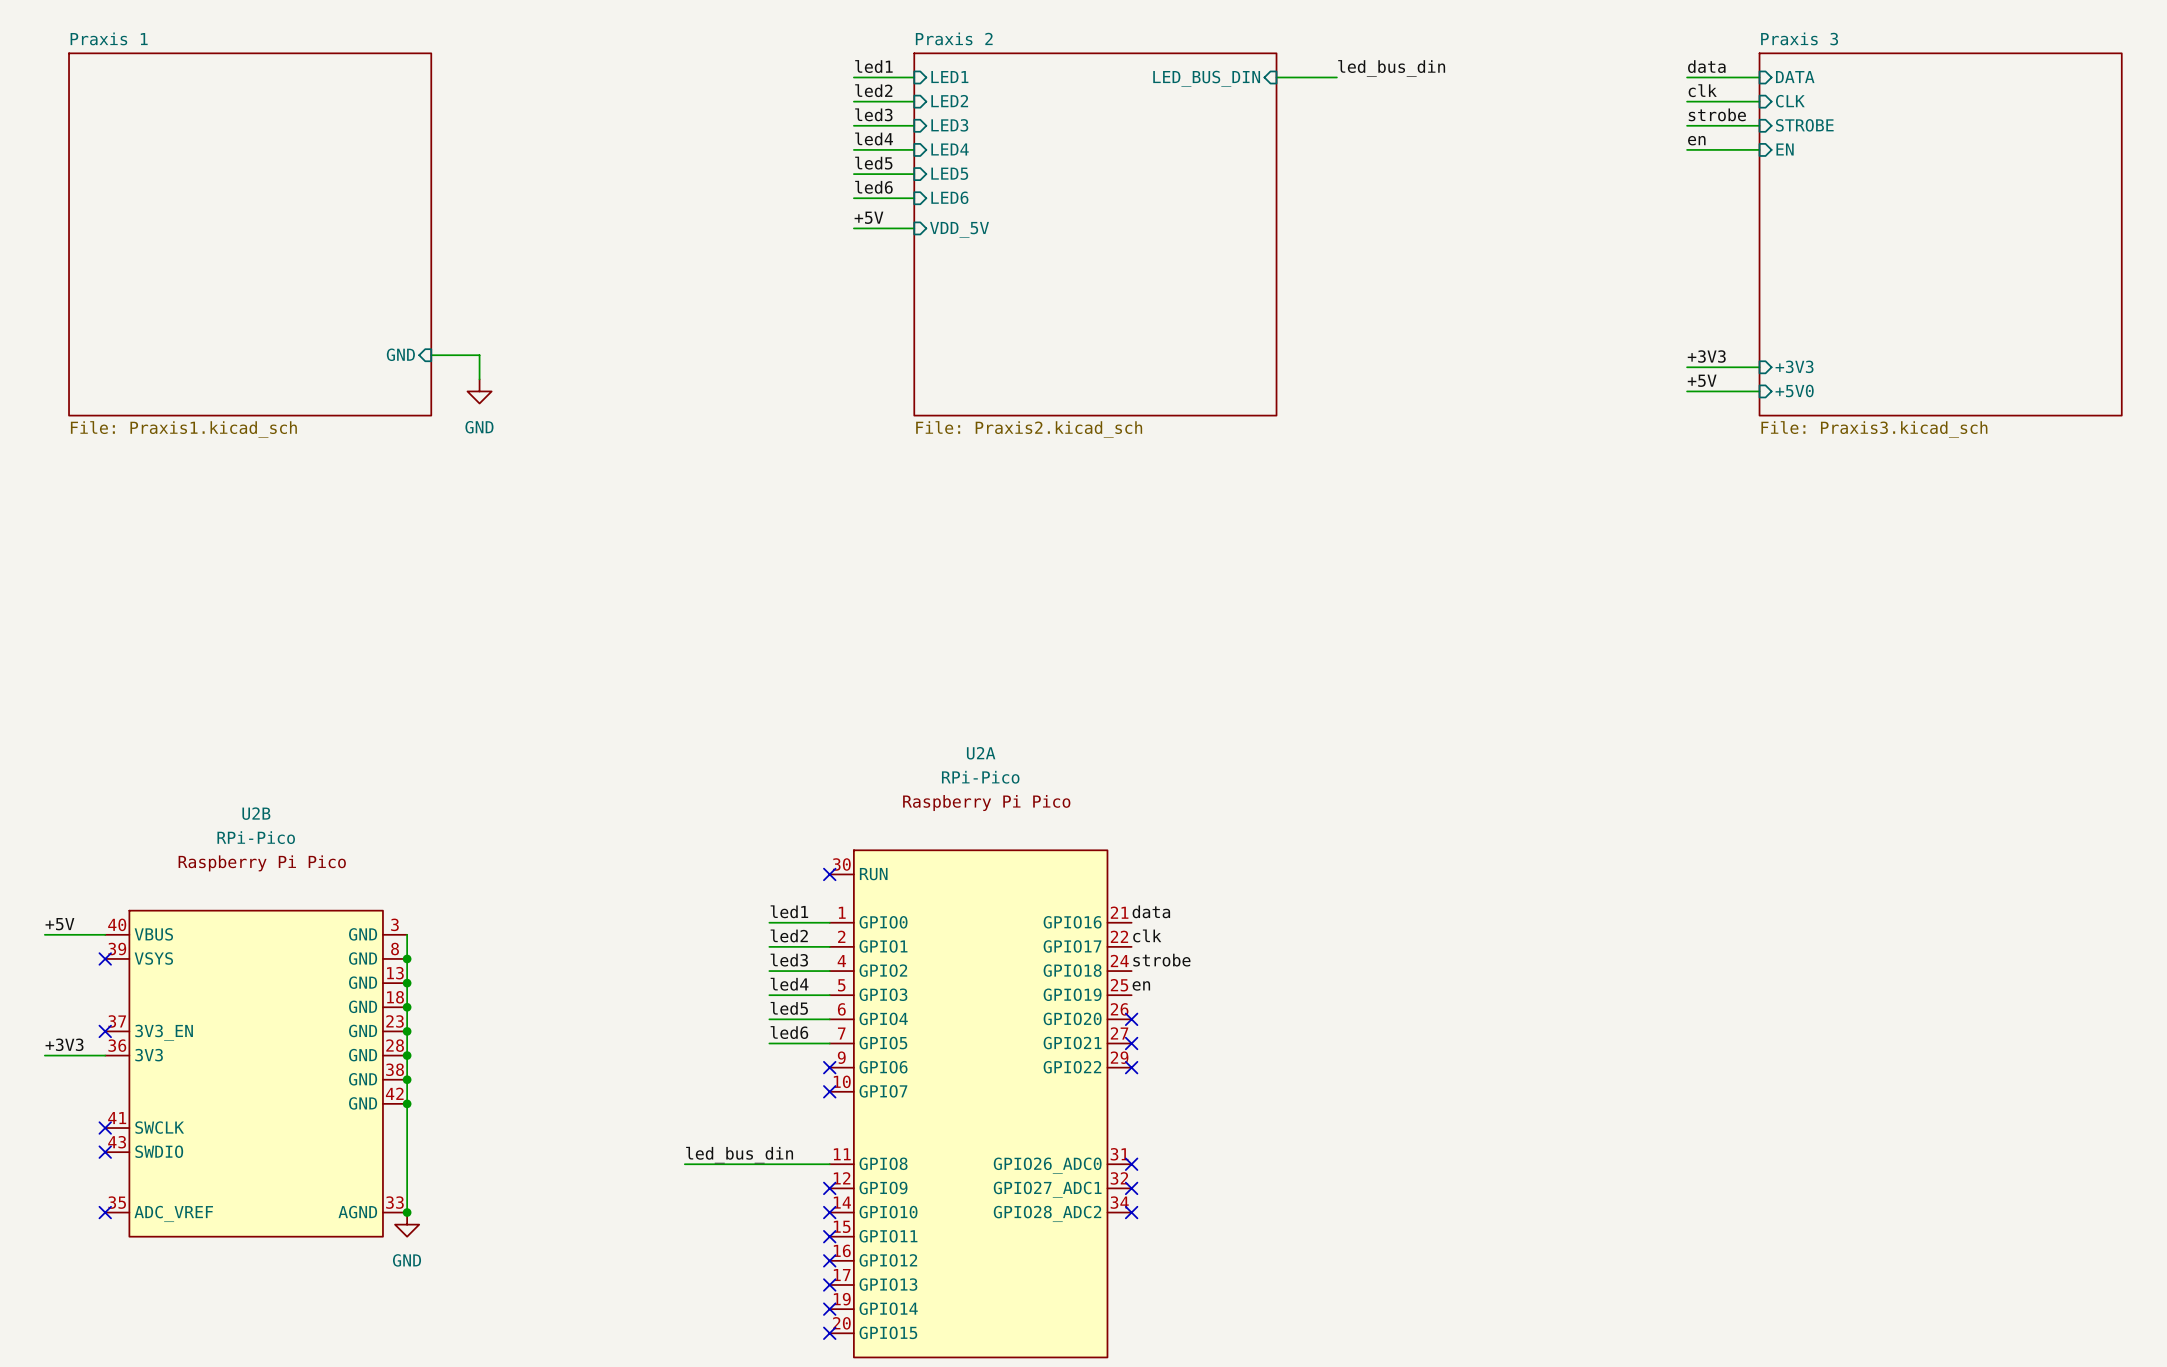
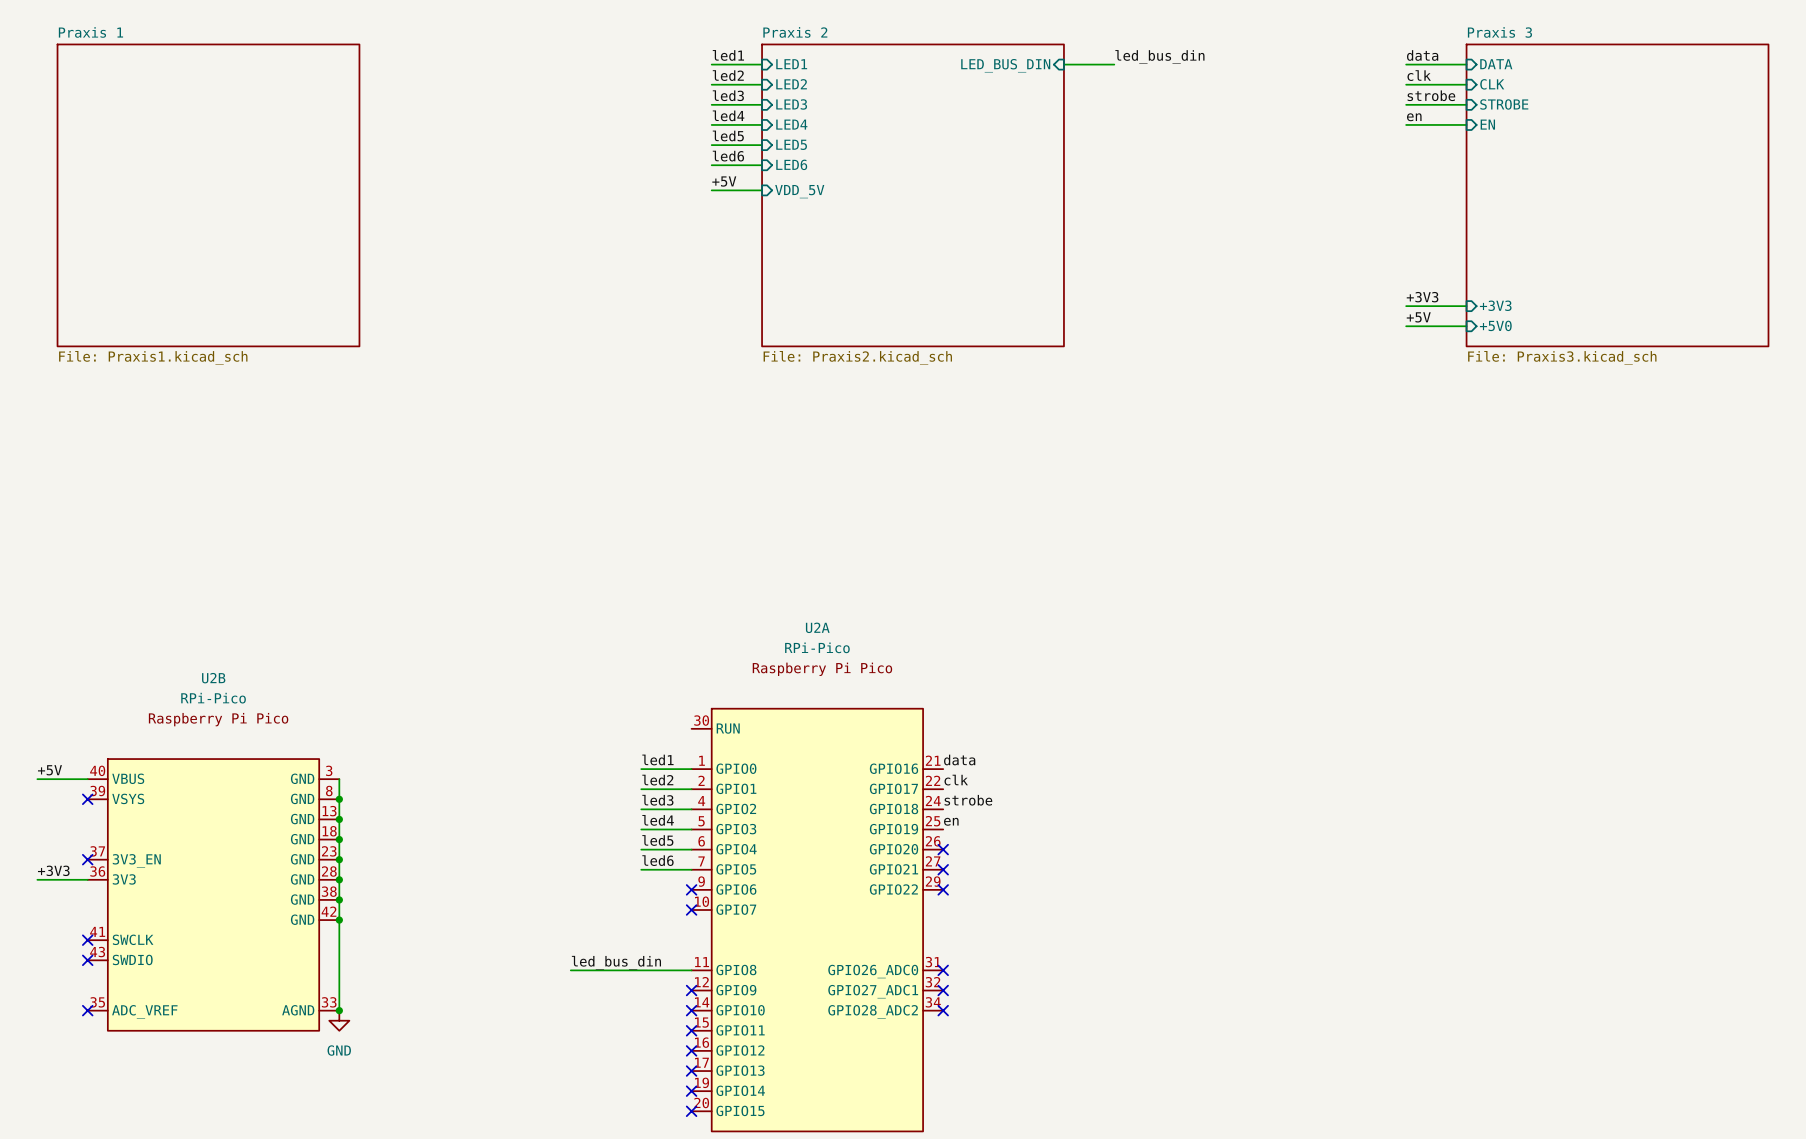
sheet pin: GND (400, 354) -> none
wire: (431, 355) (479, 355) (479, 379) -> none
power symbol: GND (479, 391) -> none
no-connect mark: (829, 874) -> none

